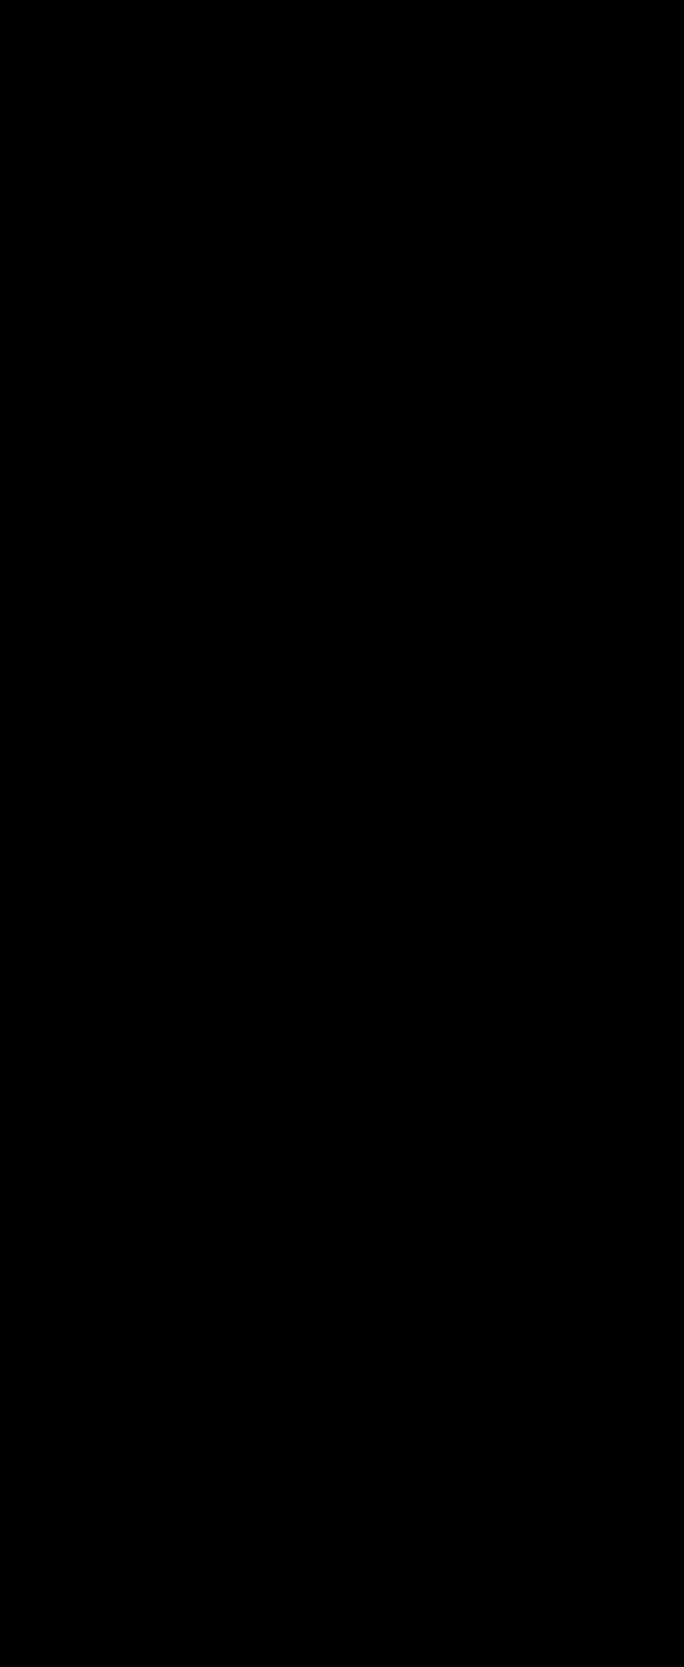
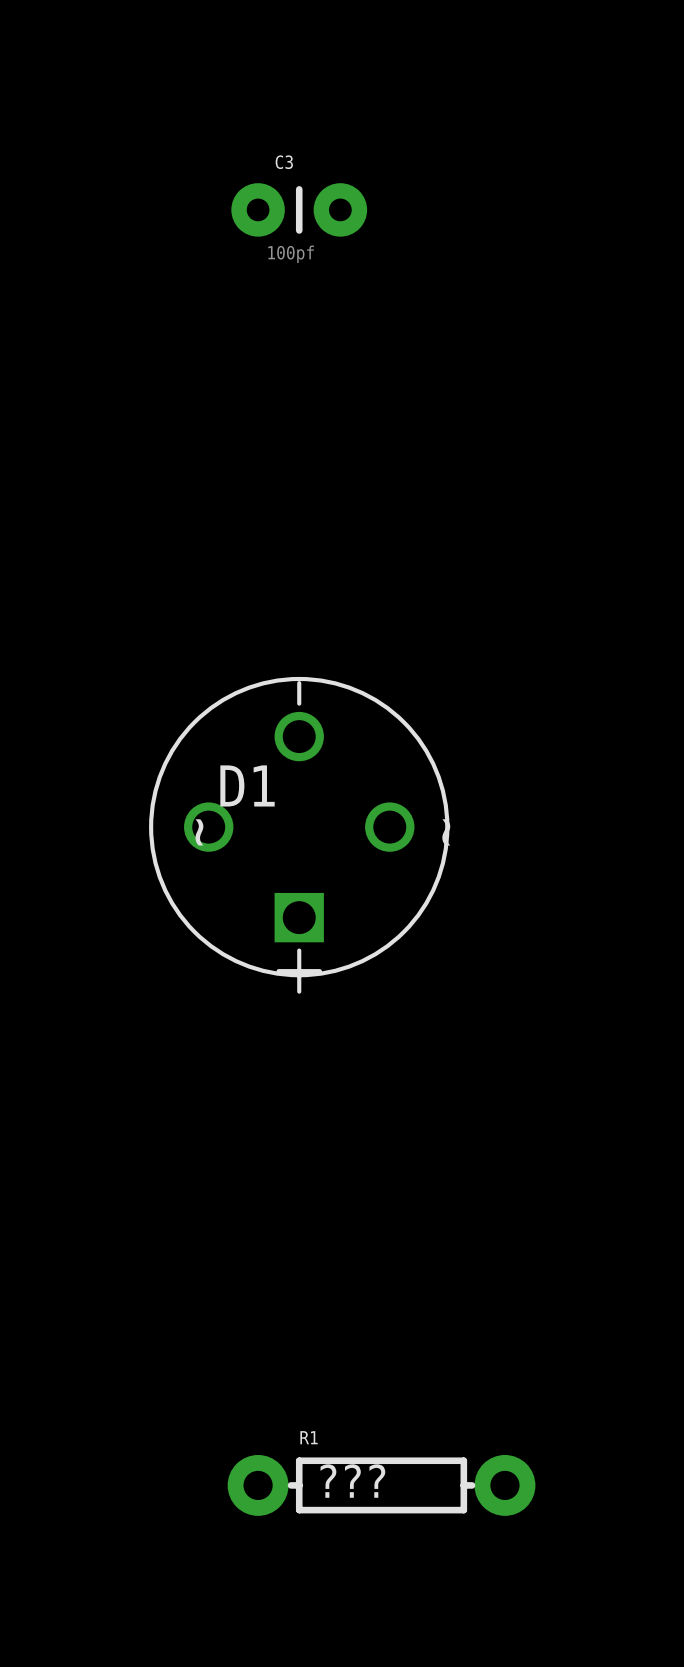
C3: none -> 100pf (299, 209)
D1: none -> (299, 835)
R1: none -> ??? (381, 1485)

